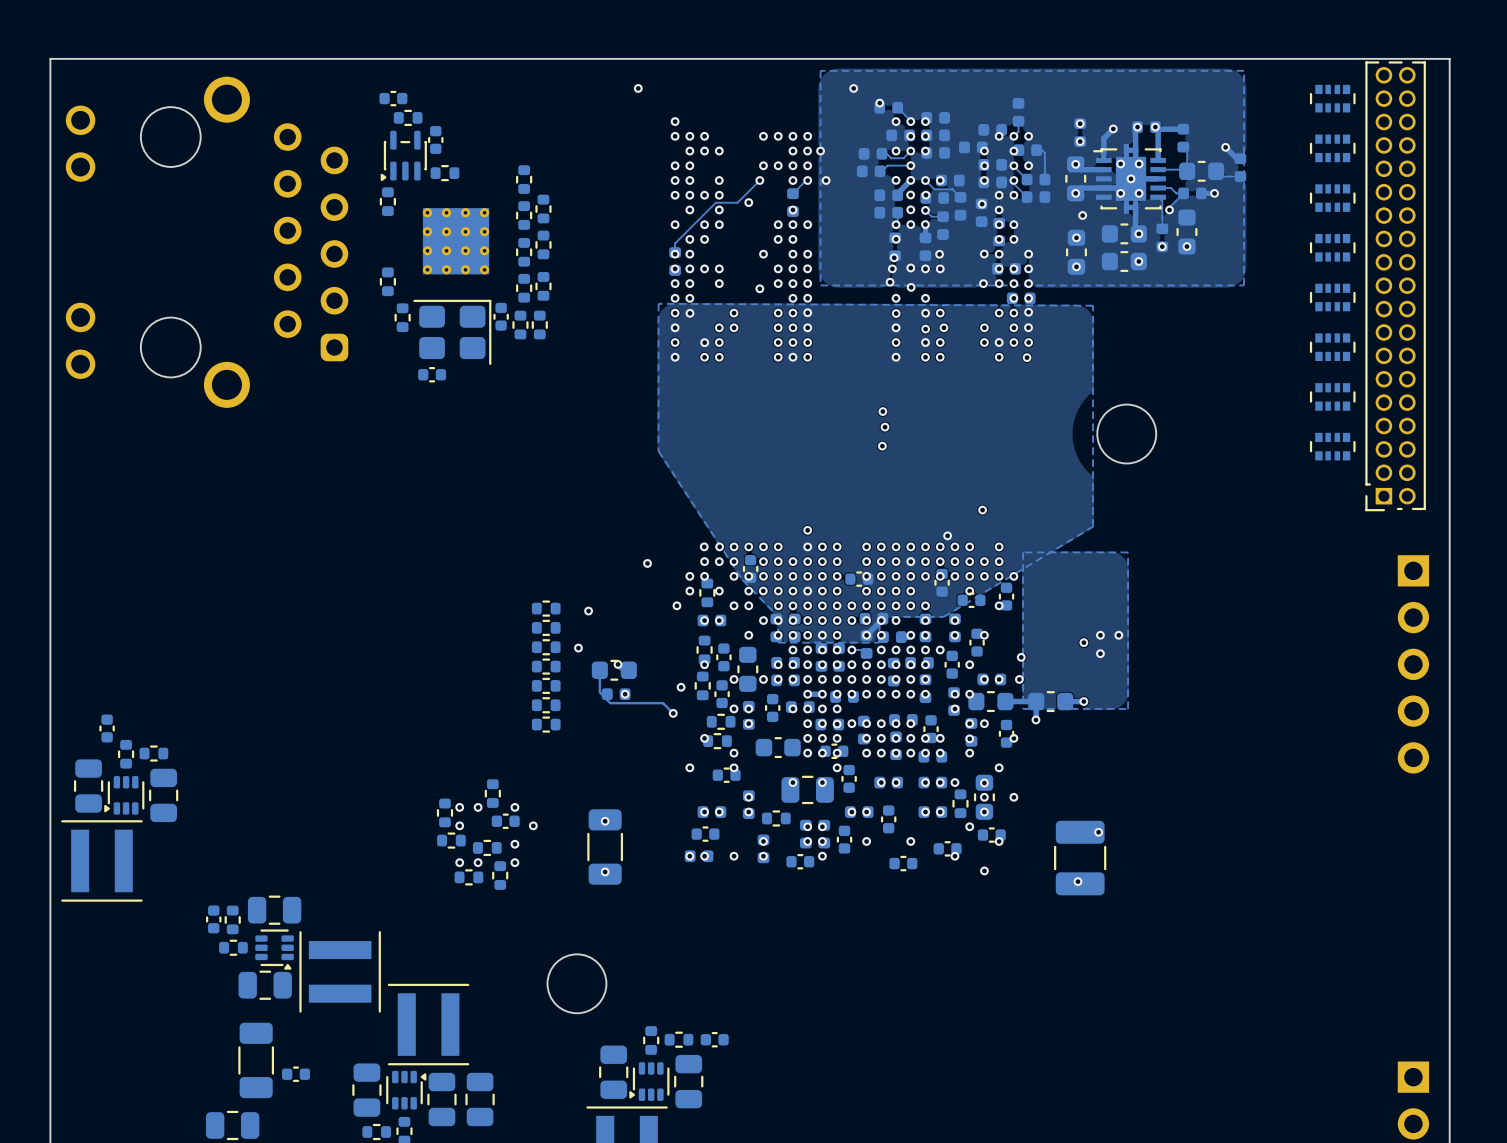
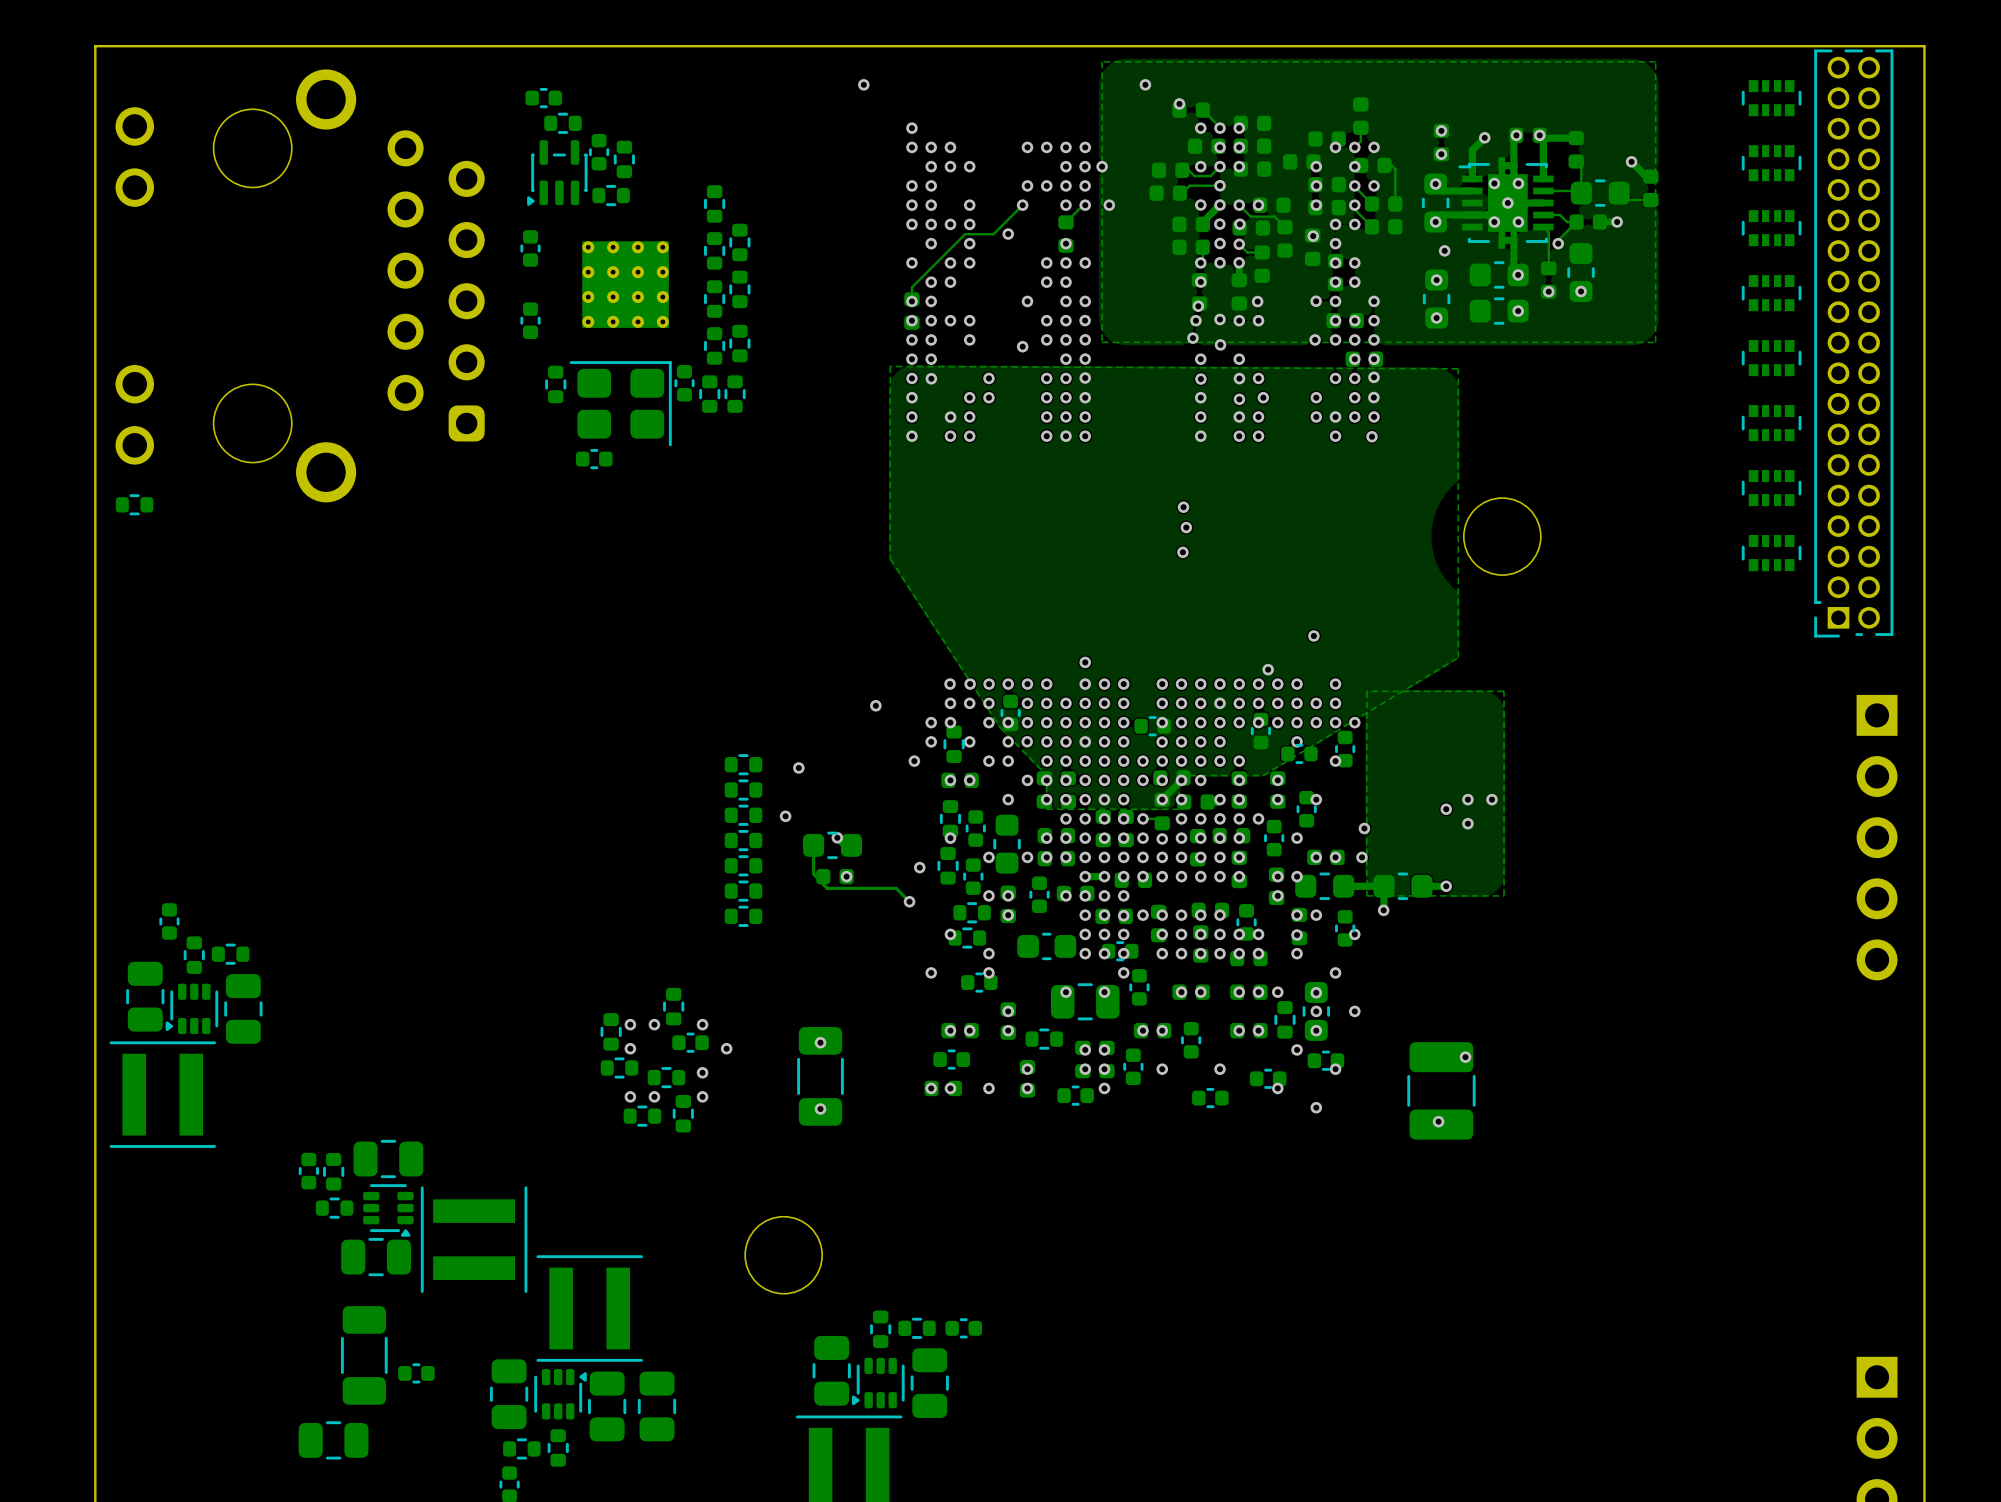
part: none -> (624, 159)
part footprint: [379, 187, 396, 217] -> [520, 230, 541, 267]
part footprint: [379, 267, 396, 297] -> [520, 302, 541, 339]
part: none -> (134, 504)

